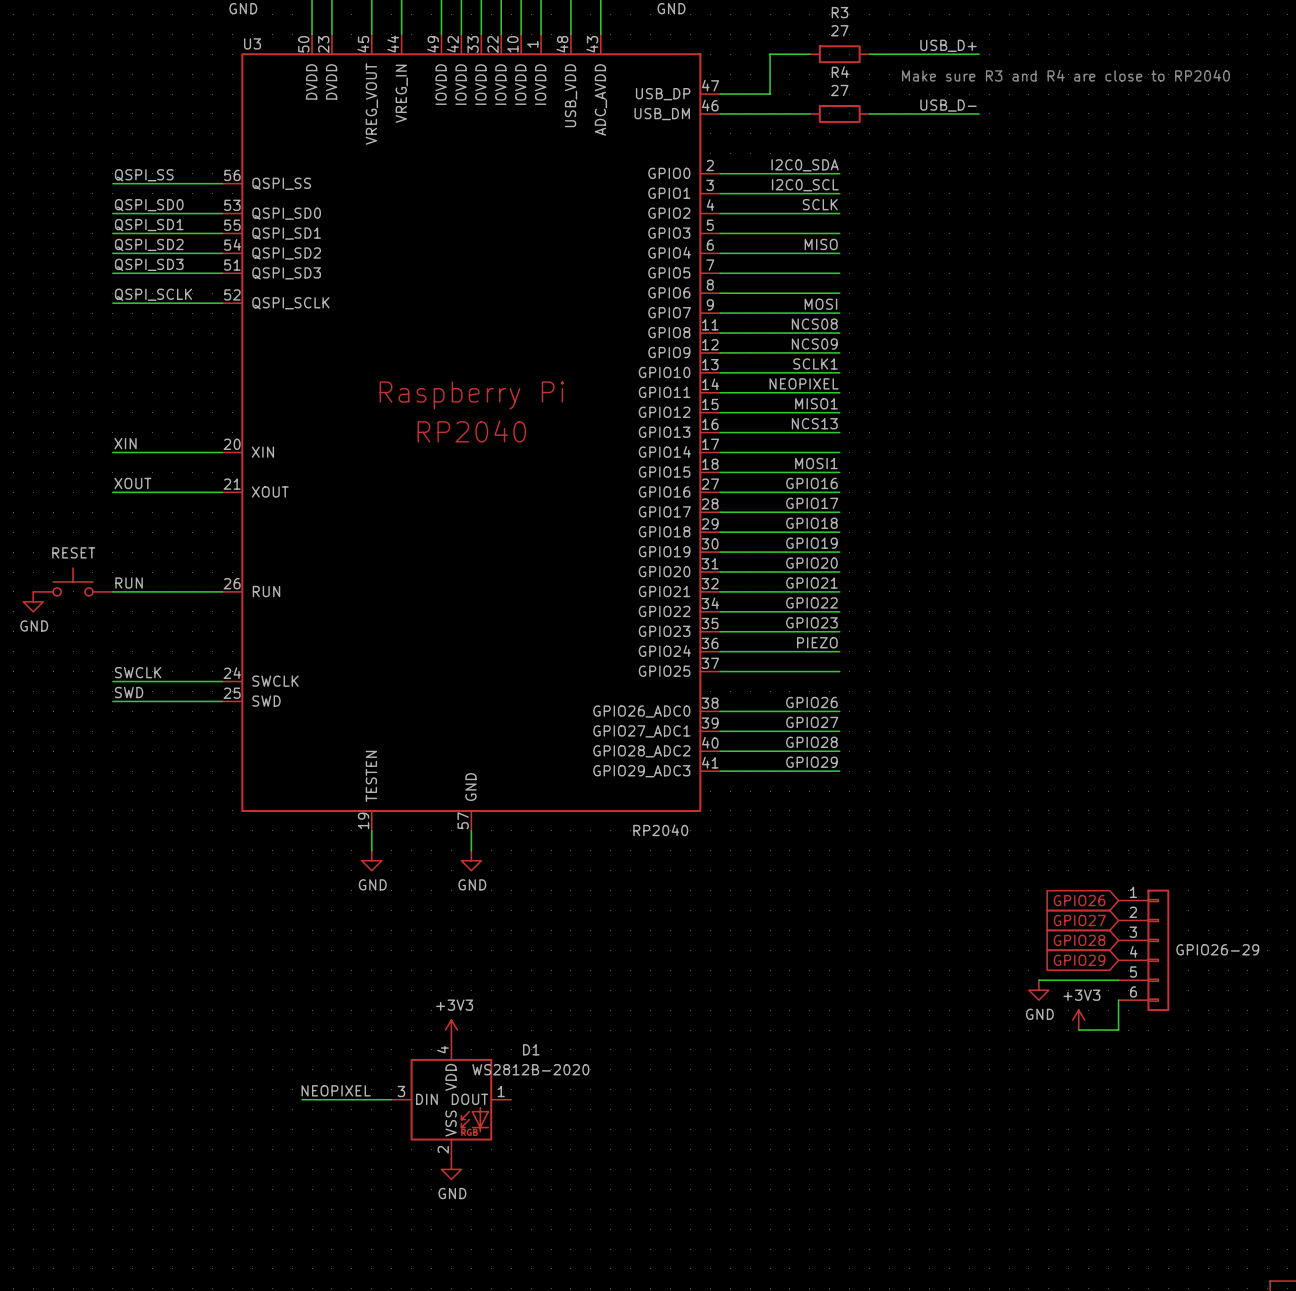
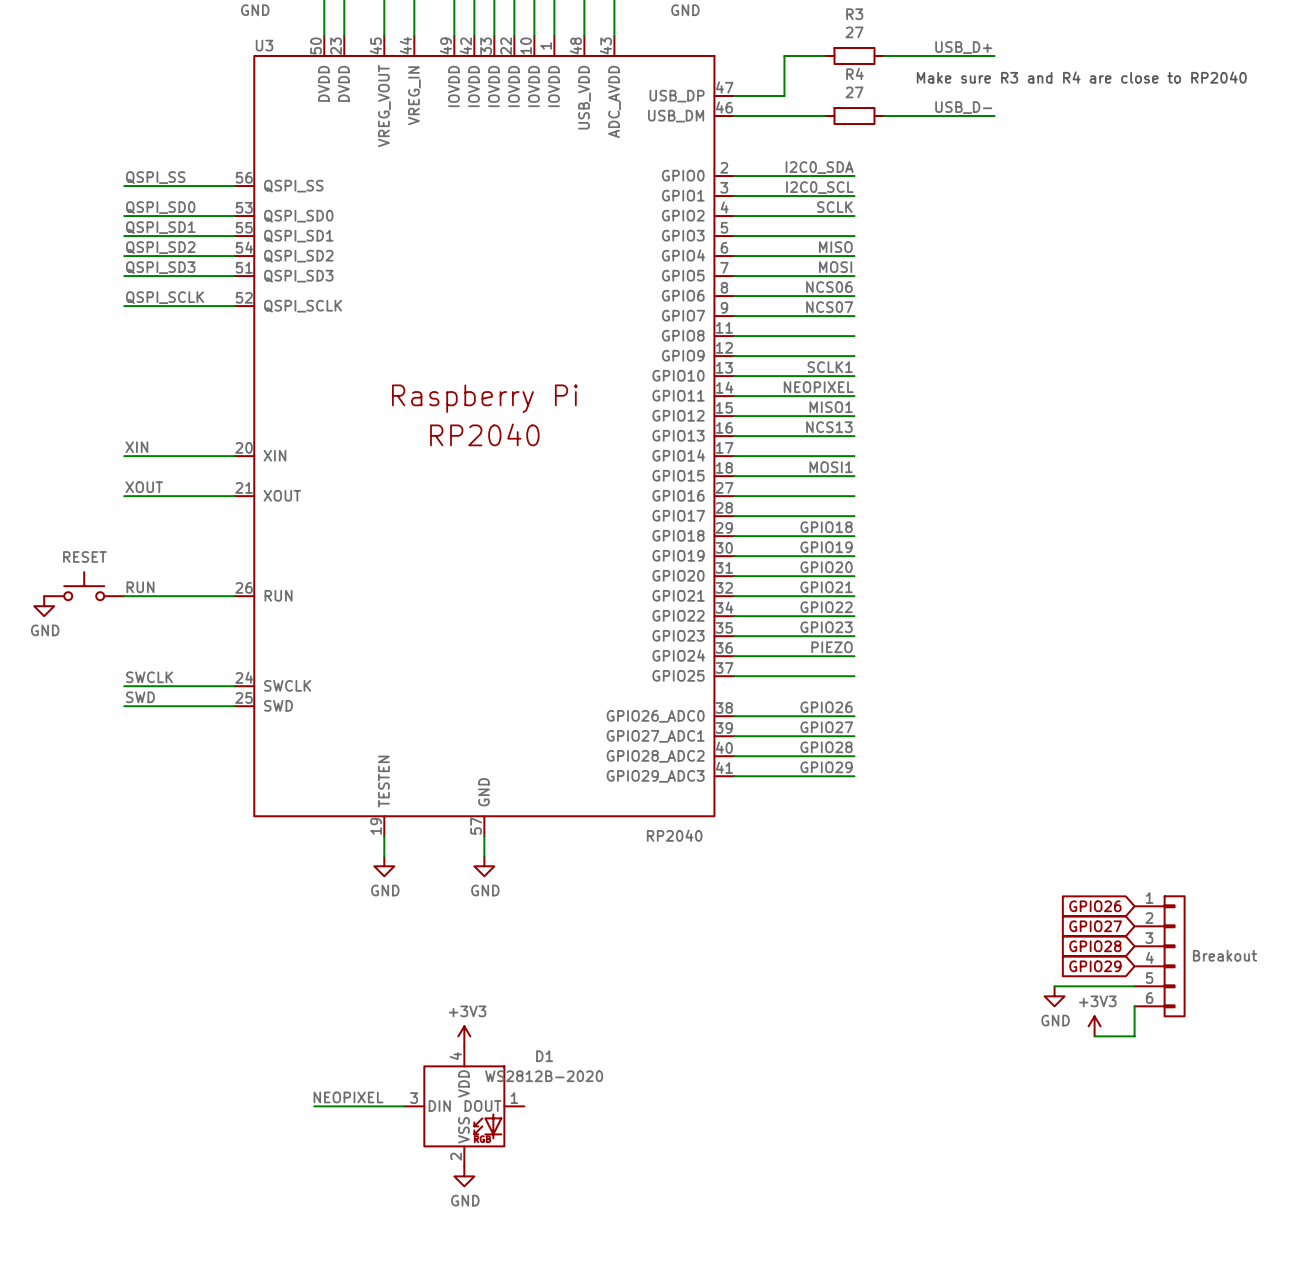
label: none -> MOSI (835, 267)
label: none -> NCS06 (829, 287)
label: MOSI (820, 304) -> NCS07 (829, 307)
label: NCS08 (814, 324) -> none
label: NCS09 (814, 344) -> none
label: GPIO16 (811, 483) -> none
label: GPIO17 (812, 503) -> none
part value: GPIO26-29 (1217, 949) -> Breakout (1224, 955)

